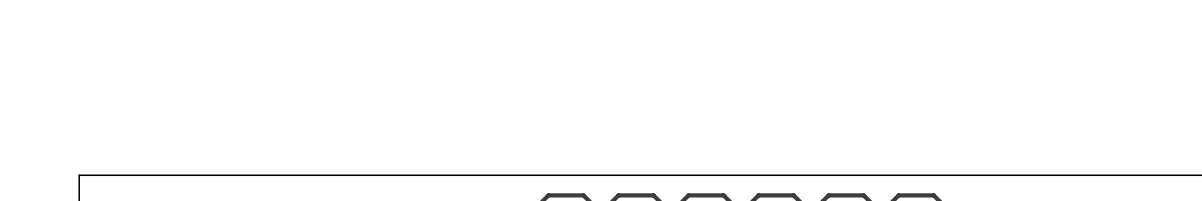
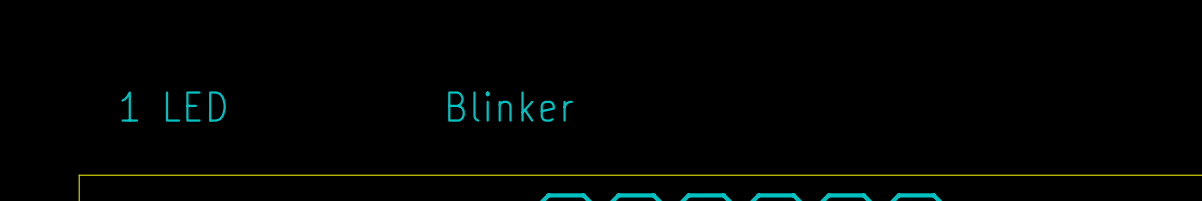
text: none -> 1 LED (173, 106)
text: none -> Blinker (510, 106)

